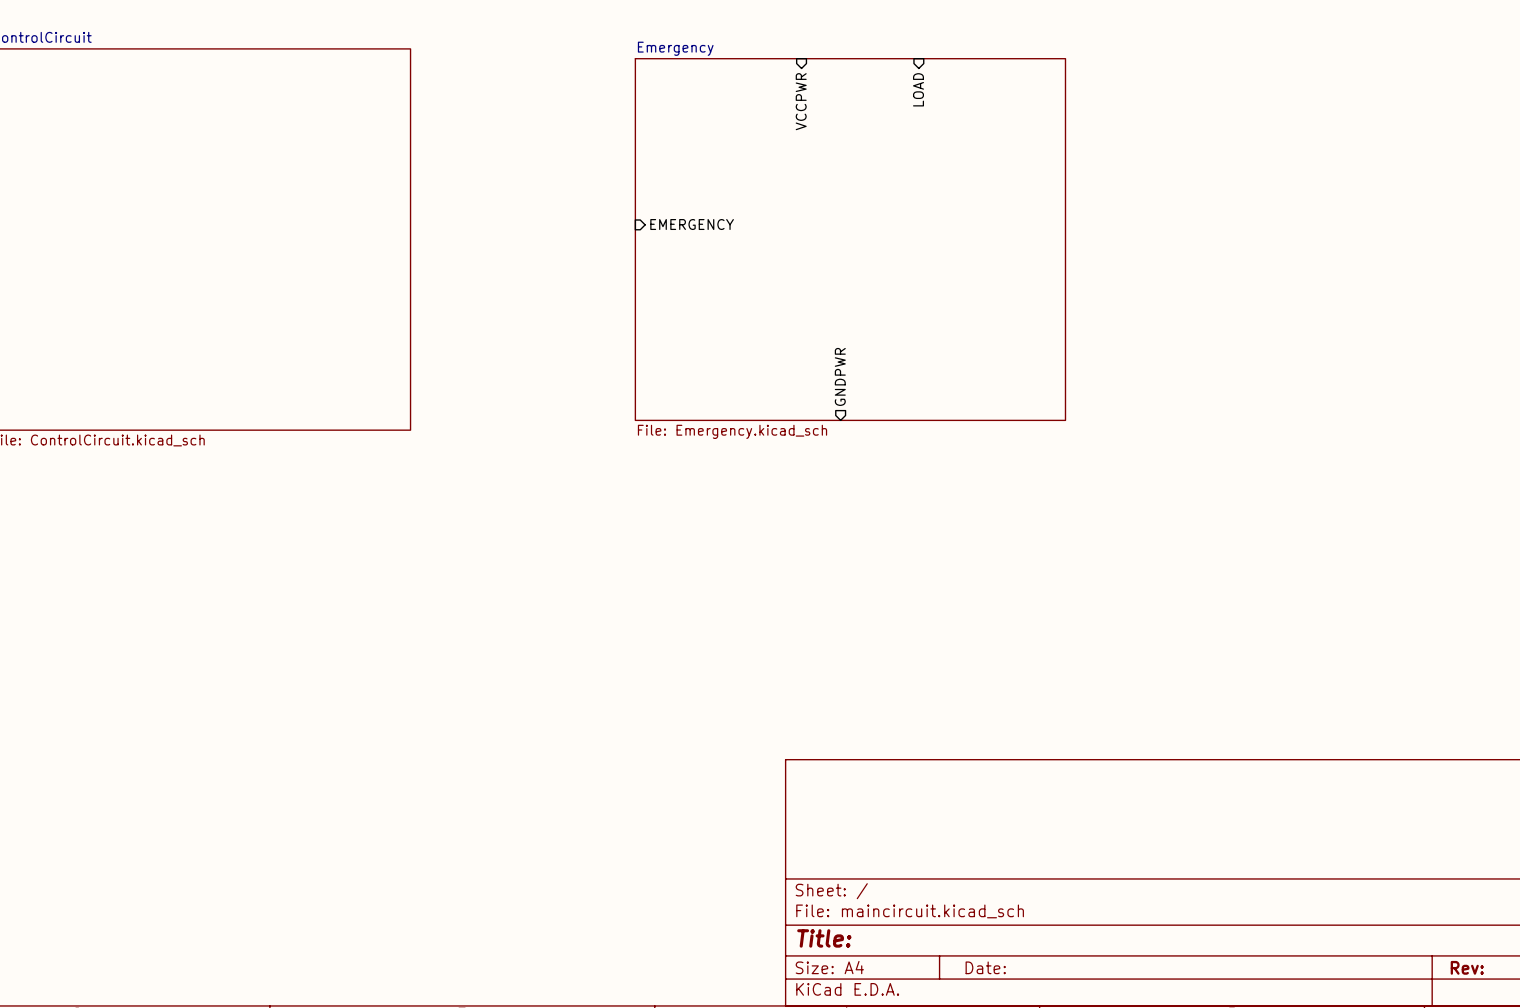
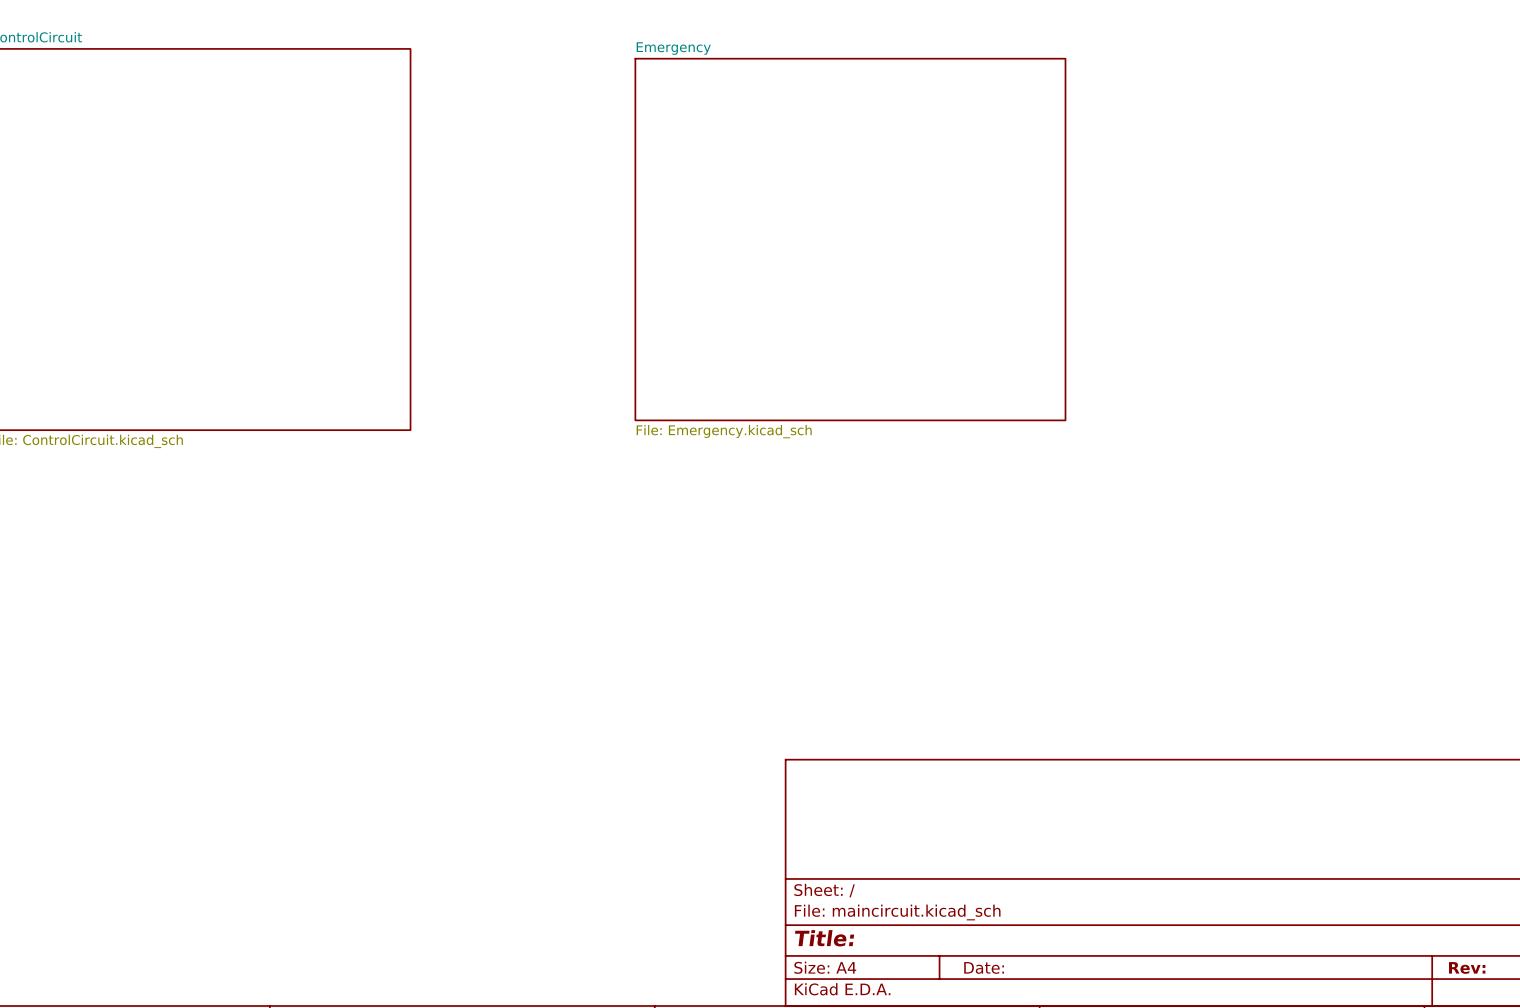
sheet pin: LOAD (918, 89) -> none
sheet pin: VCCPWR (801, 101) -> none
sheet pin: EMERGENCY (692, 224) -> none
sheet pin: GNDPWR (840, 376) -> none

